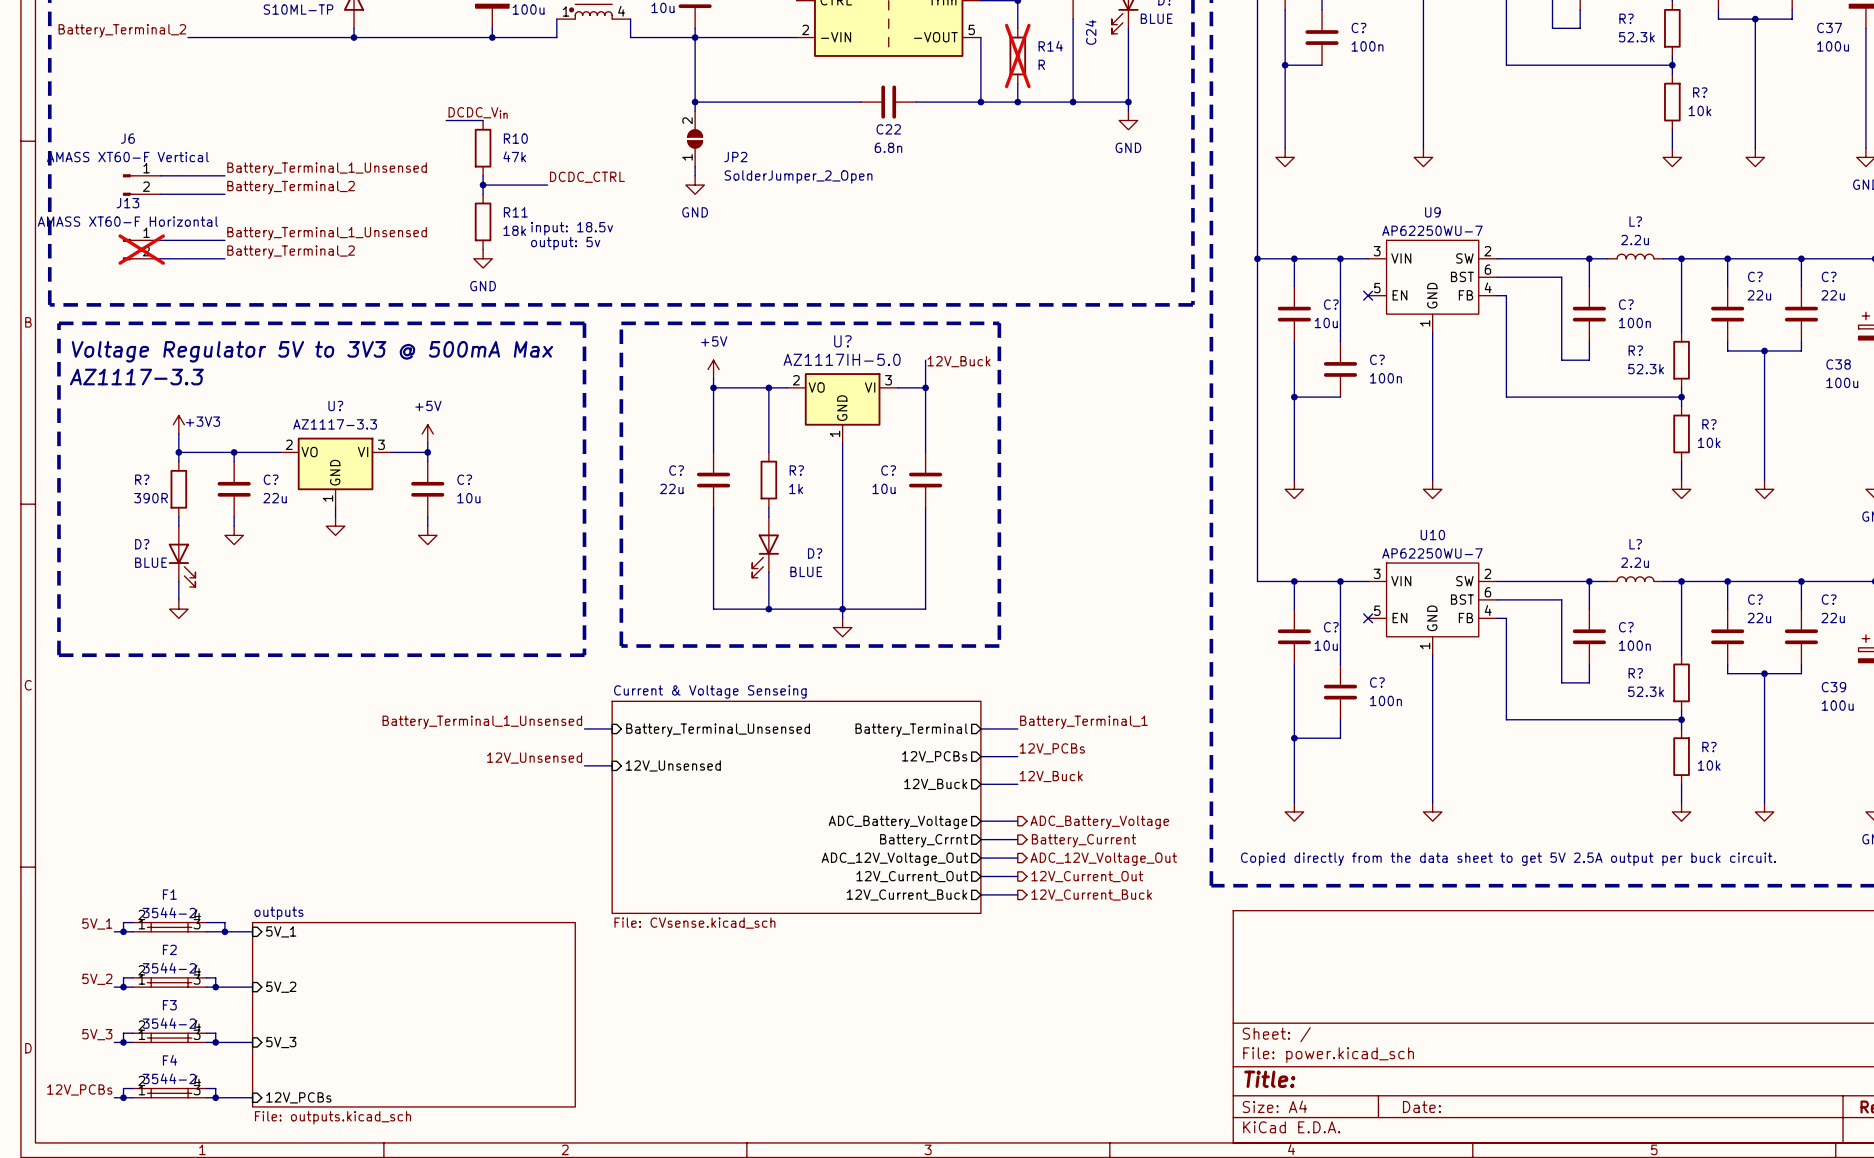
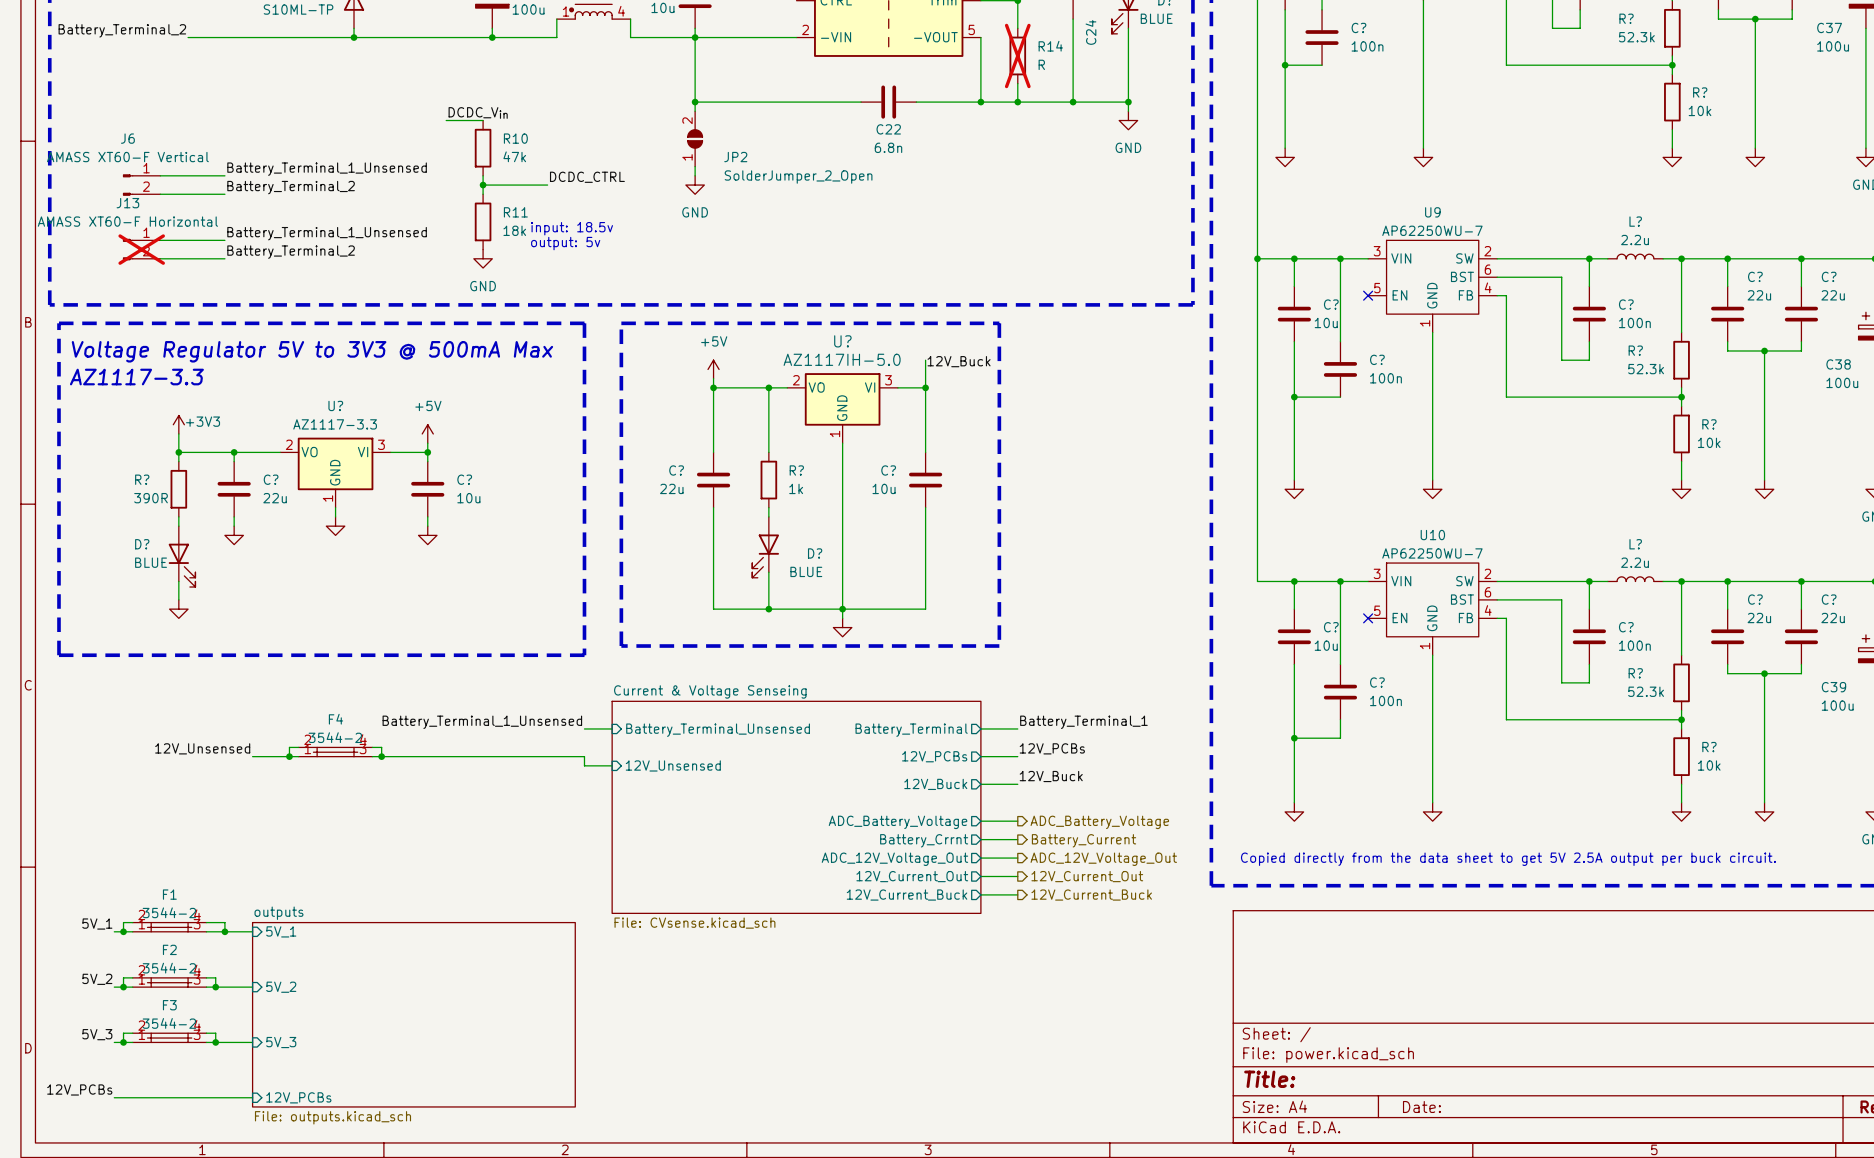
wire: none -> (298, 747) (289, 747) (289, 756)
wire: none -> (372, 747) (381, 747) (381, 756)
label: none -> 12V_Unsensed (202, 748)
wire: none -> (252, 756) (298, 756)
junction: none -> (289, 756)
wire: none -> (372, 756) (584, 756) (584, 765)
junction: none -> (381, 756)
label: 12V_Unsensed (534, 758) -> none
wire: (132, 1088) (123, 1088) (123, 1097) -> none
wire: (206, 1088) (215, 1088) (215, 1097) -> none
F4 position: (169, 1093) -> (335, 752)
junction: (123, 1097) -> none
junction: (215, 1097) -> none

